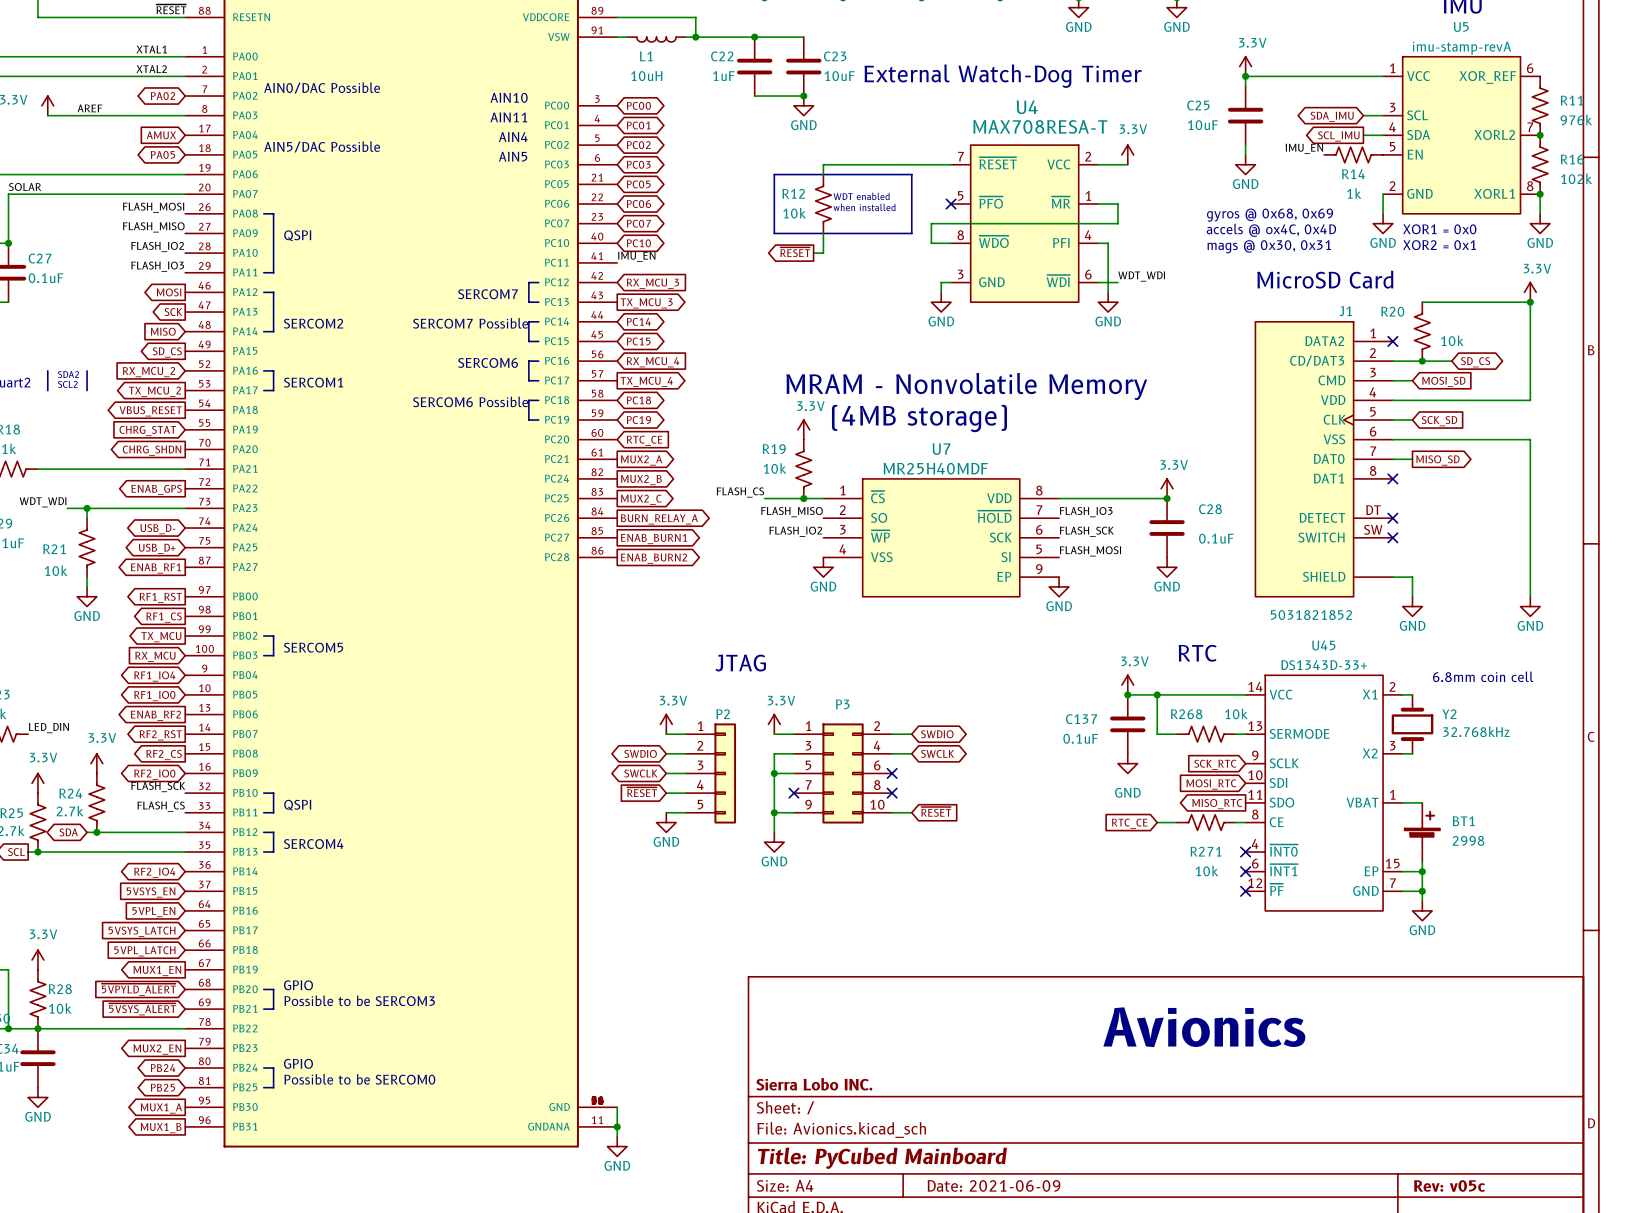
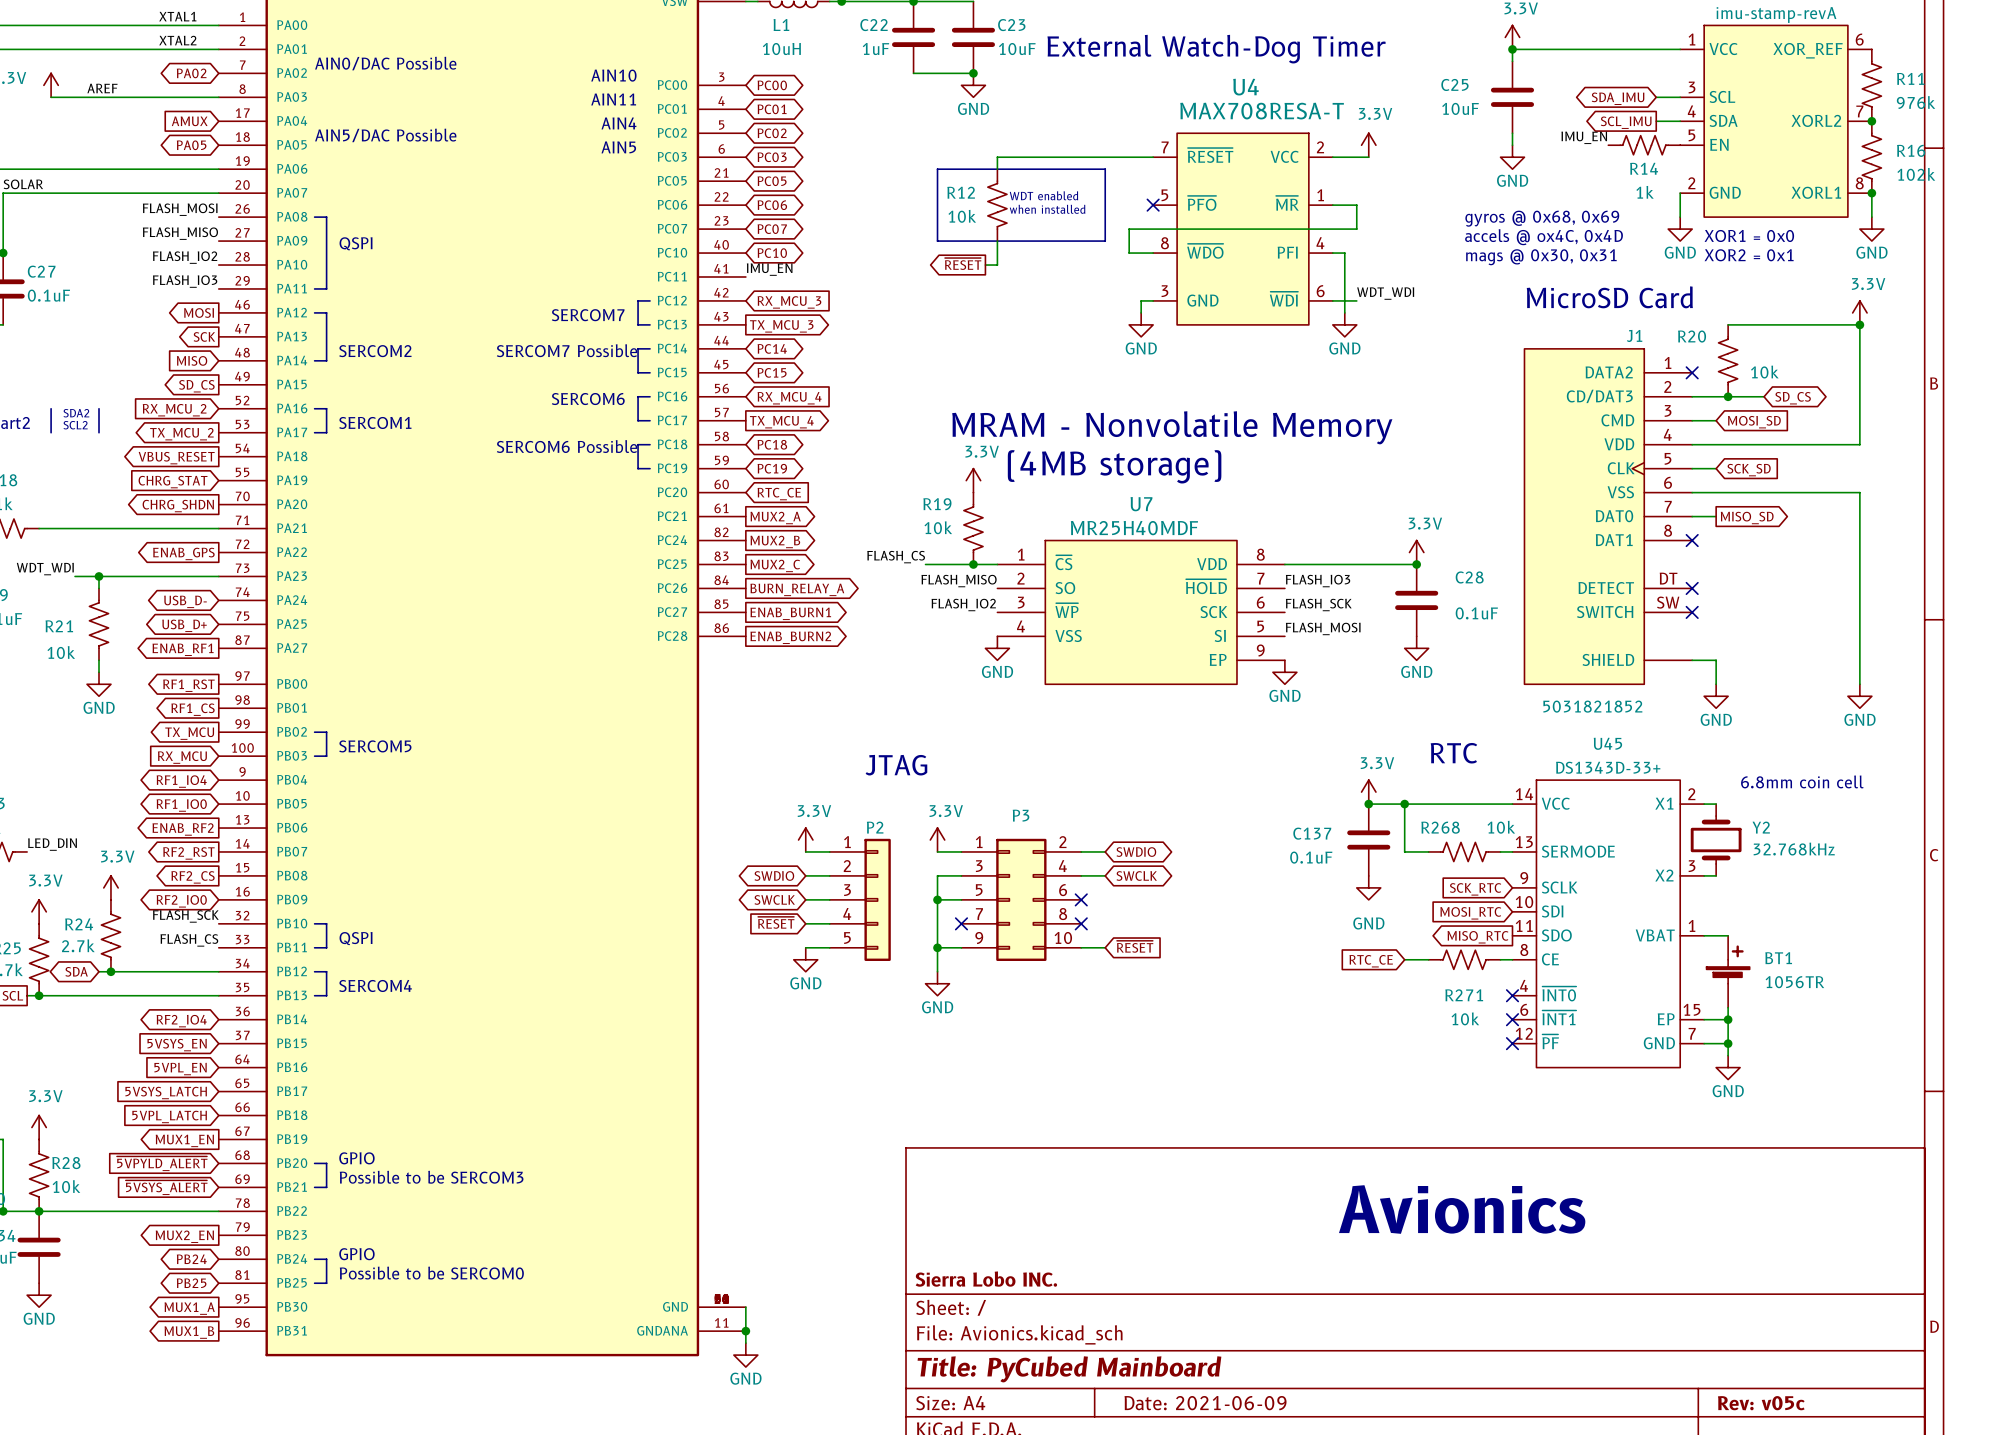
BT1 value: 2998 (1468, 840) -> 1056TR (1794, 982)

